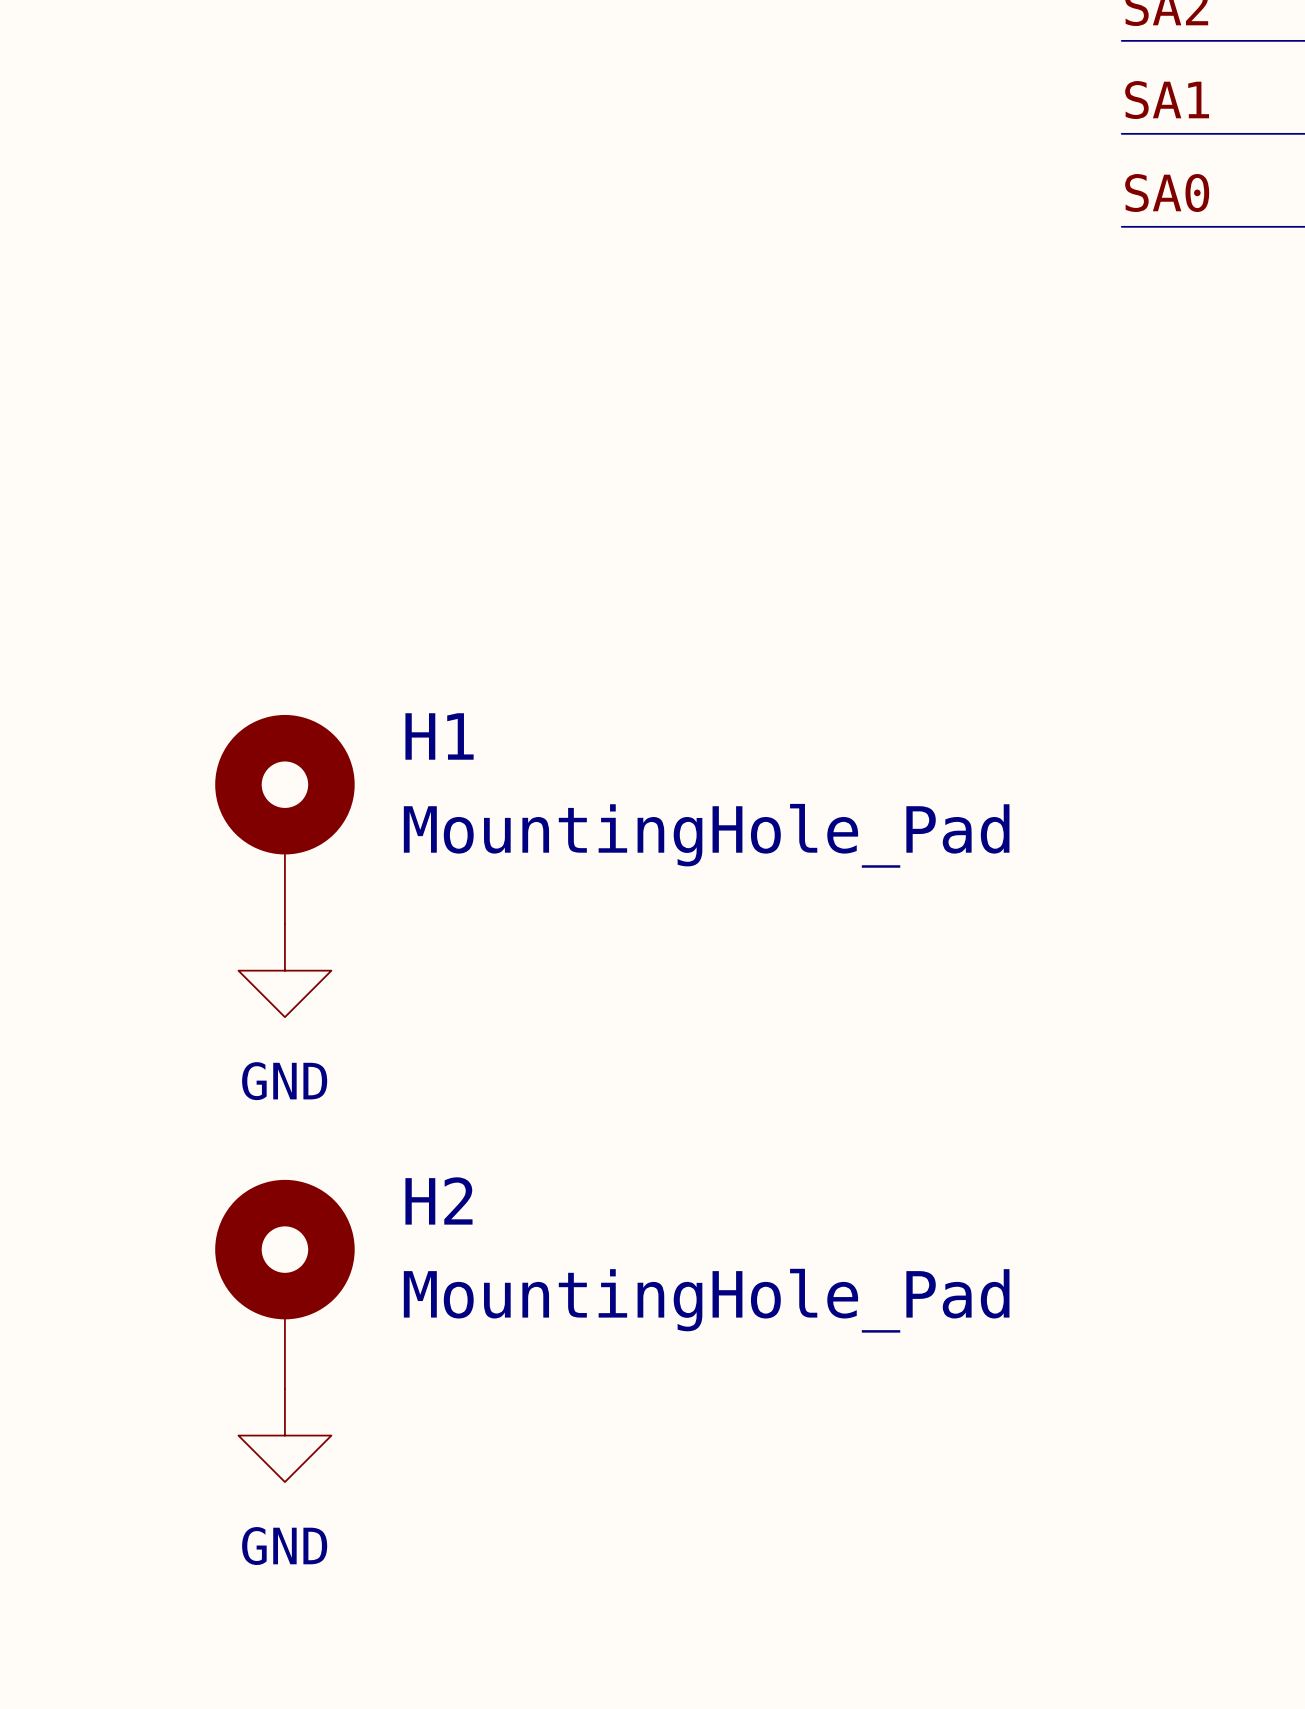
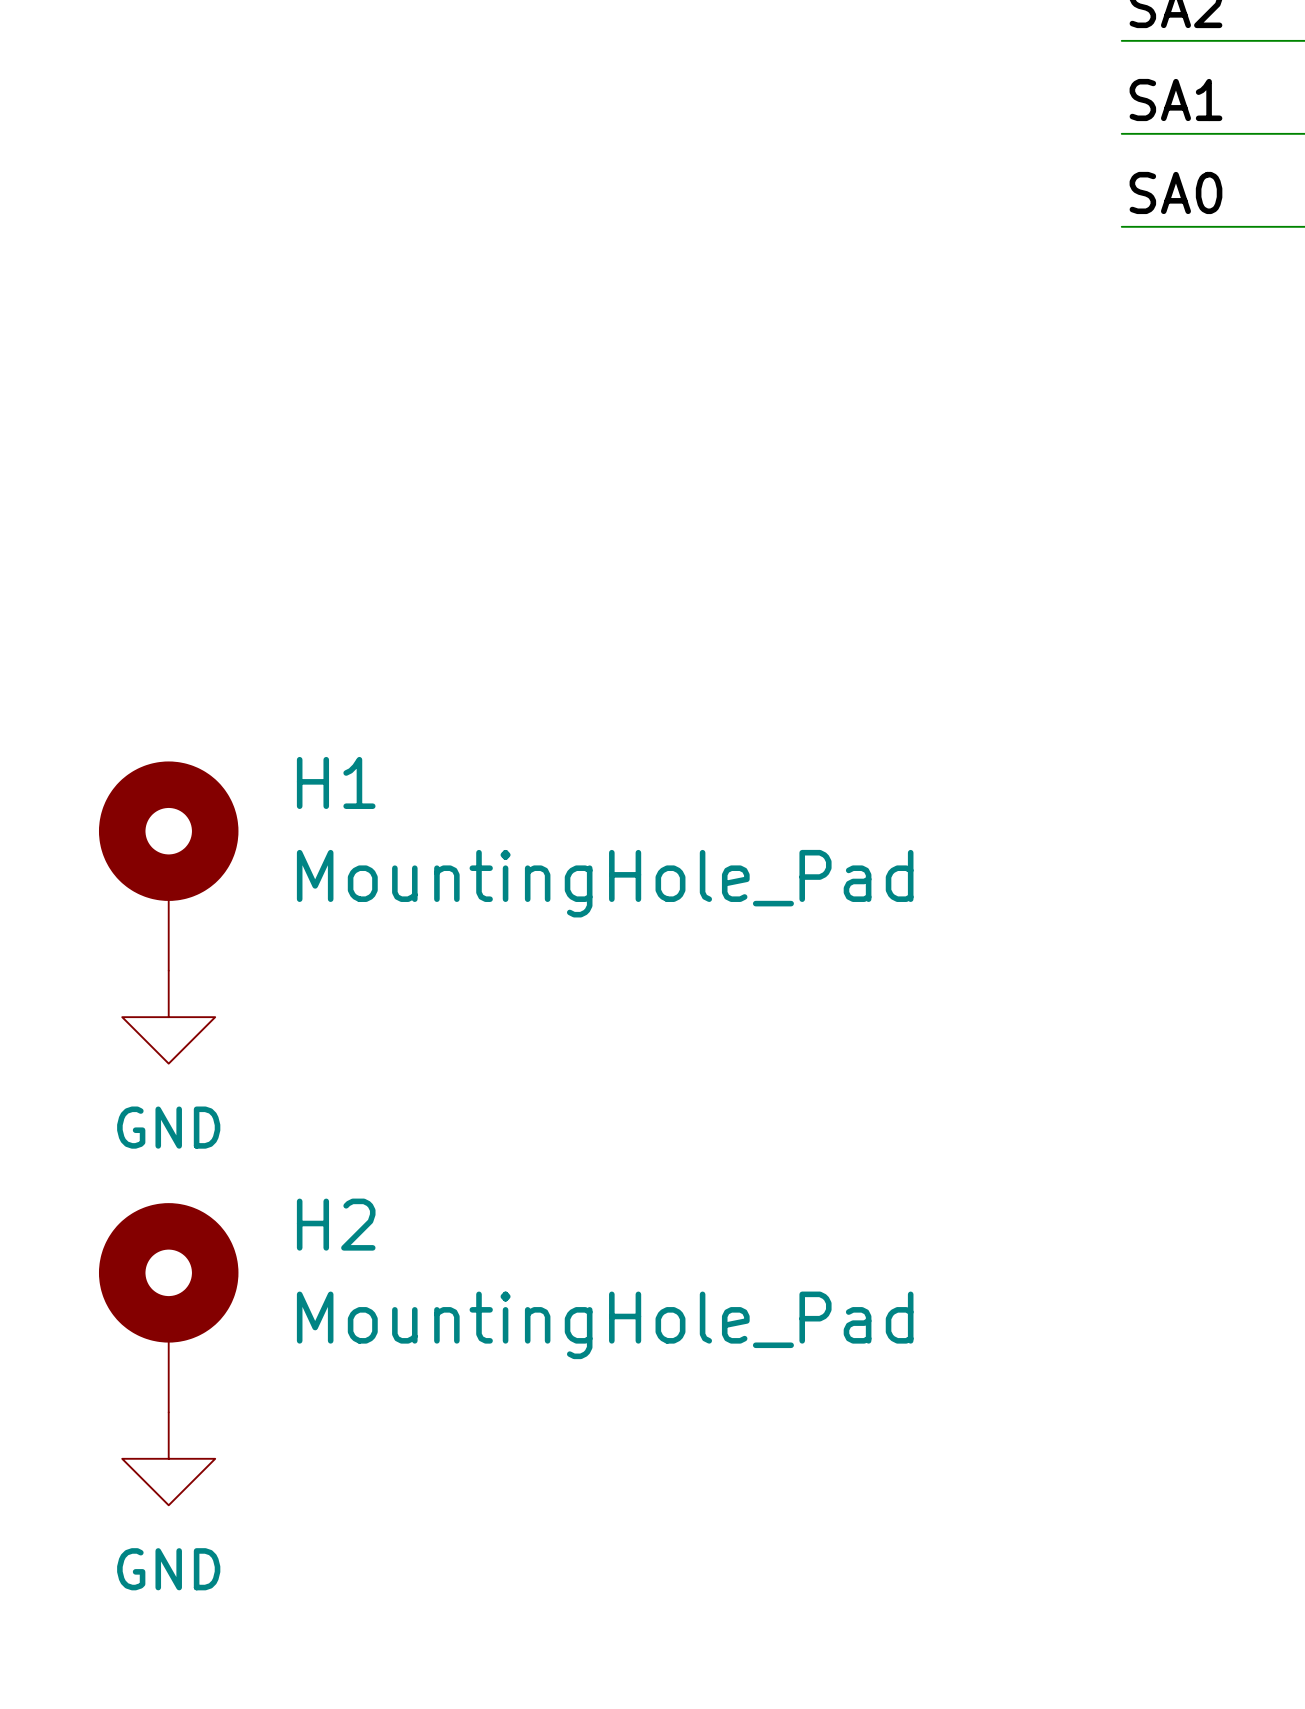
H1 position: (284, 819) -> (168, 866)
power symbol position: GND (284, 970) -> GND (168, 1017)
H2 position: (284, 1284) -> (168, 1307)
power symbol position: GND (284, 1435) -> GND (168, 1458)

